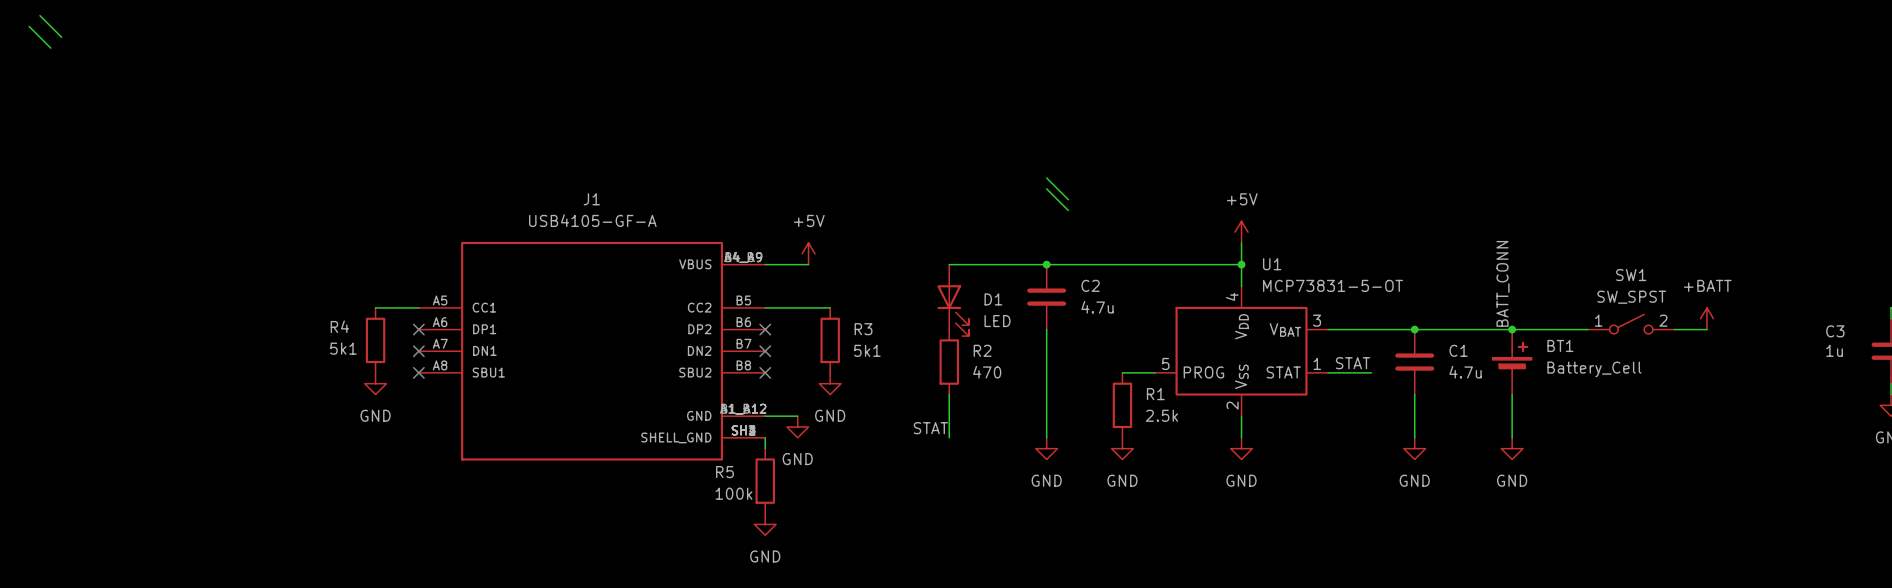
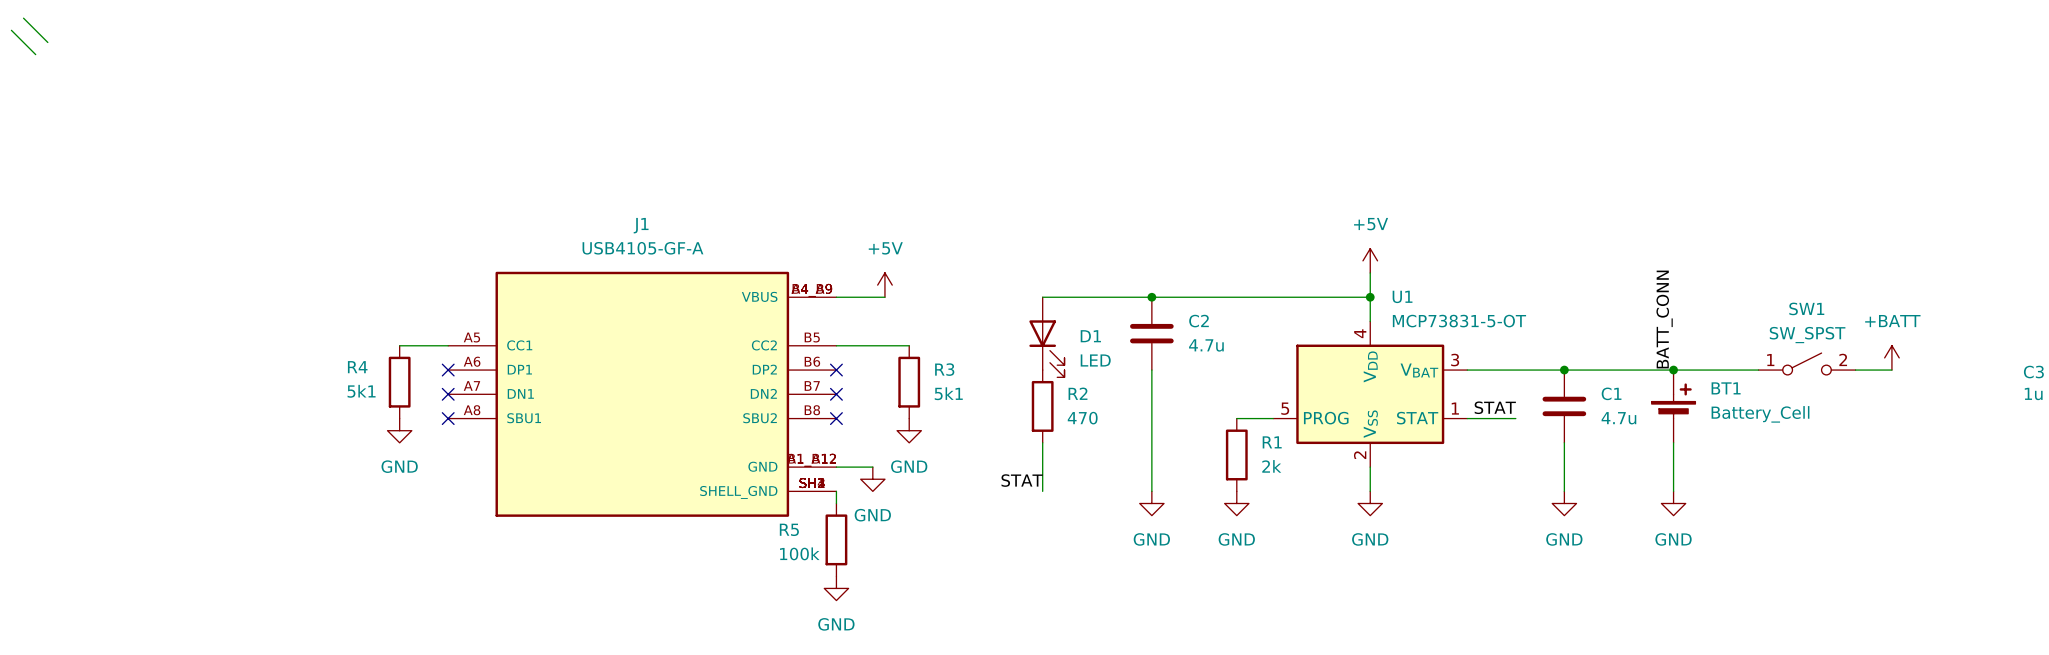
wire: (1046, 178) (1068, 199) -> none
wire: (1046, 188) (1068, 210) -> none
R1 value: 2.5k (1161, 415) -> 2k (1271, 466)

